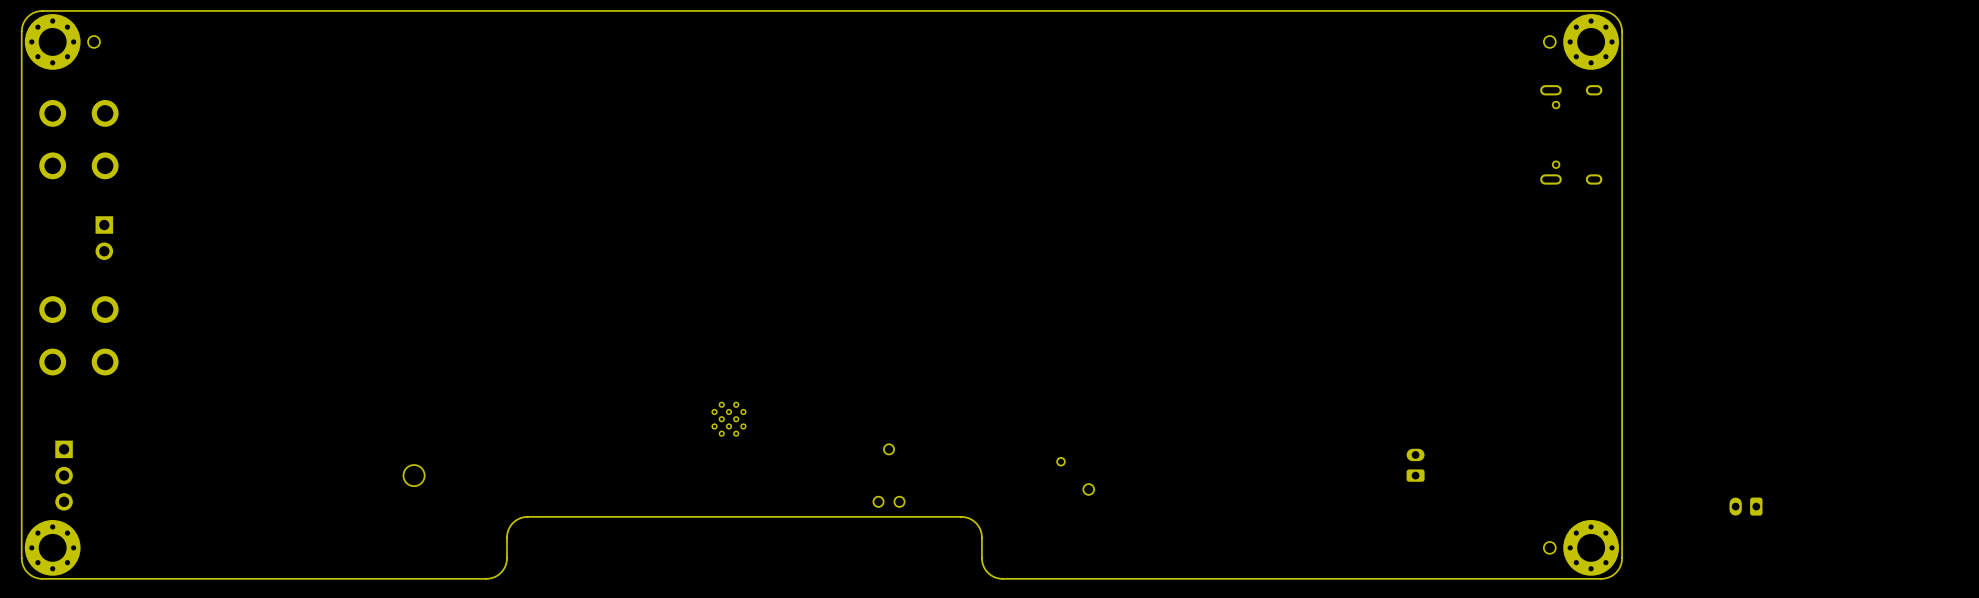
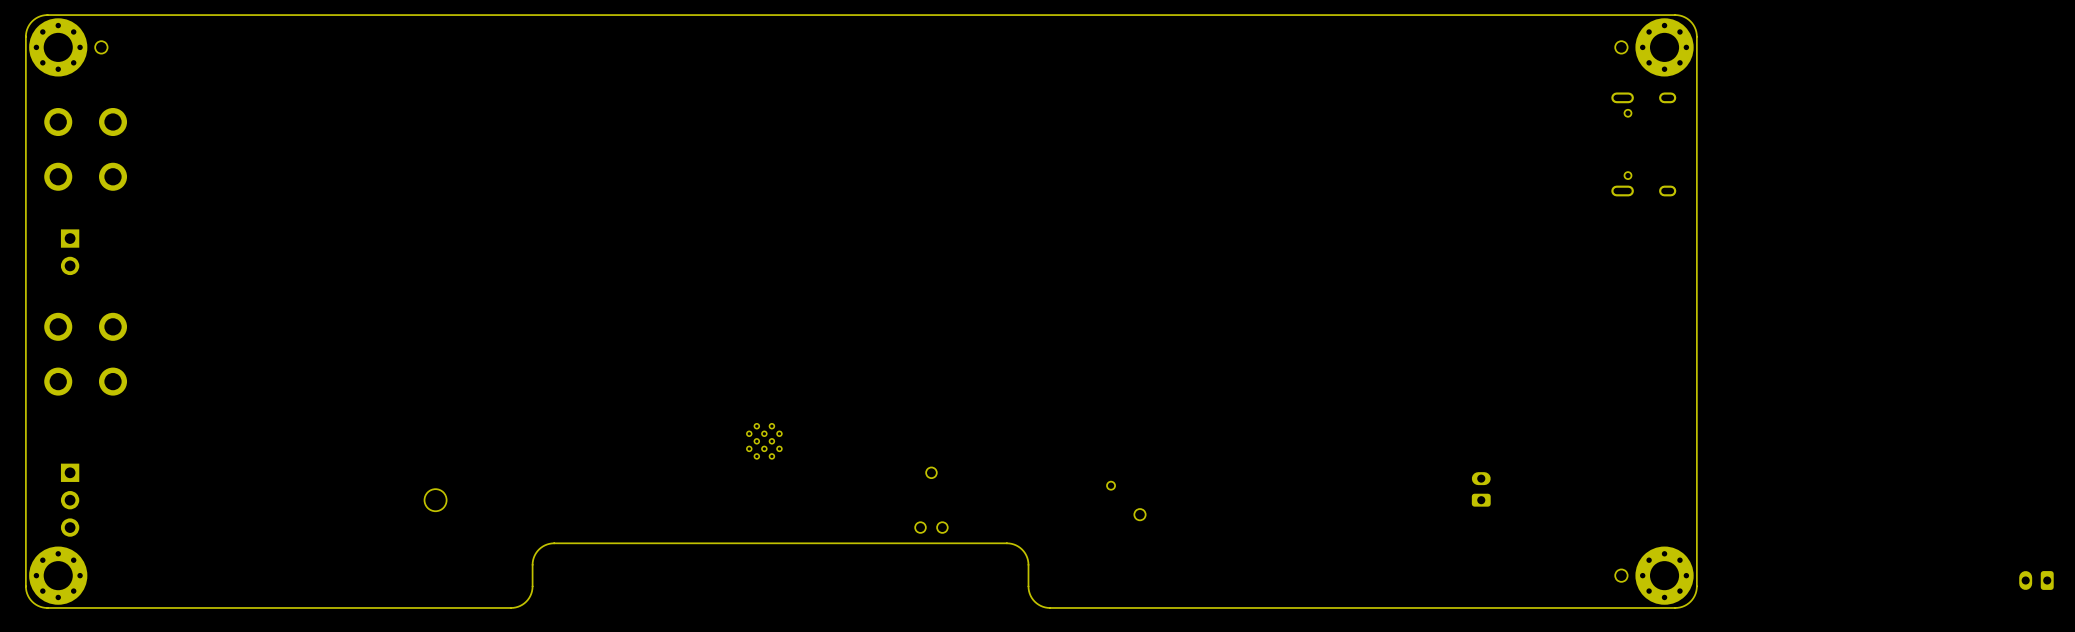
part position: (104, 238) -> (70, 252)
part position: (1745, 506) -> (2036, 580)

